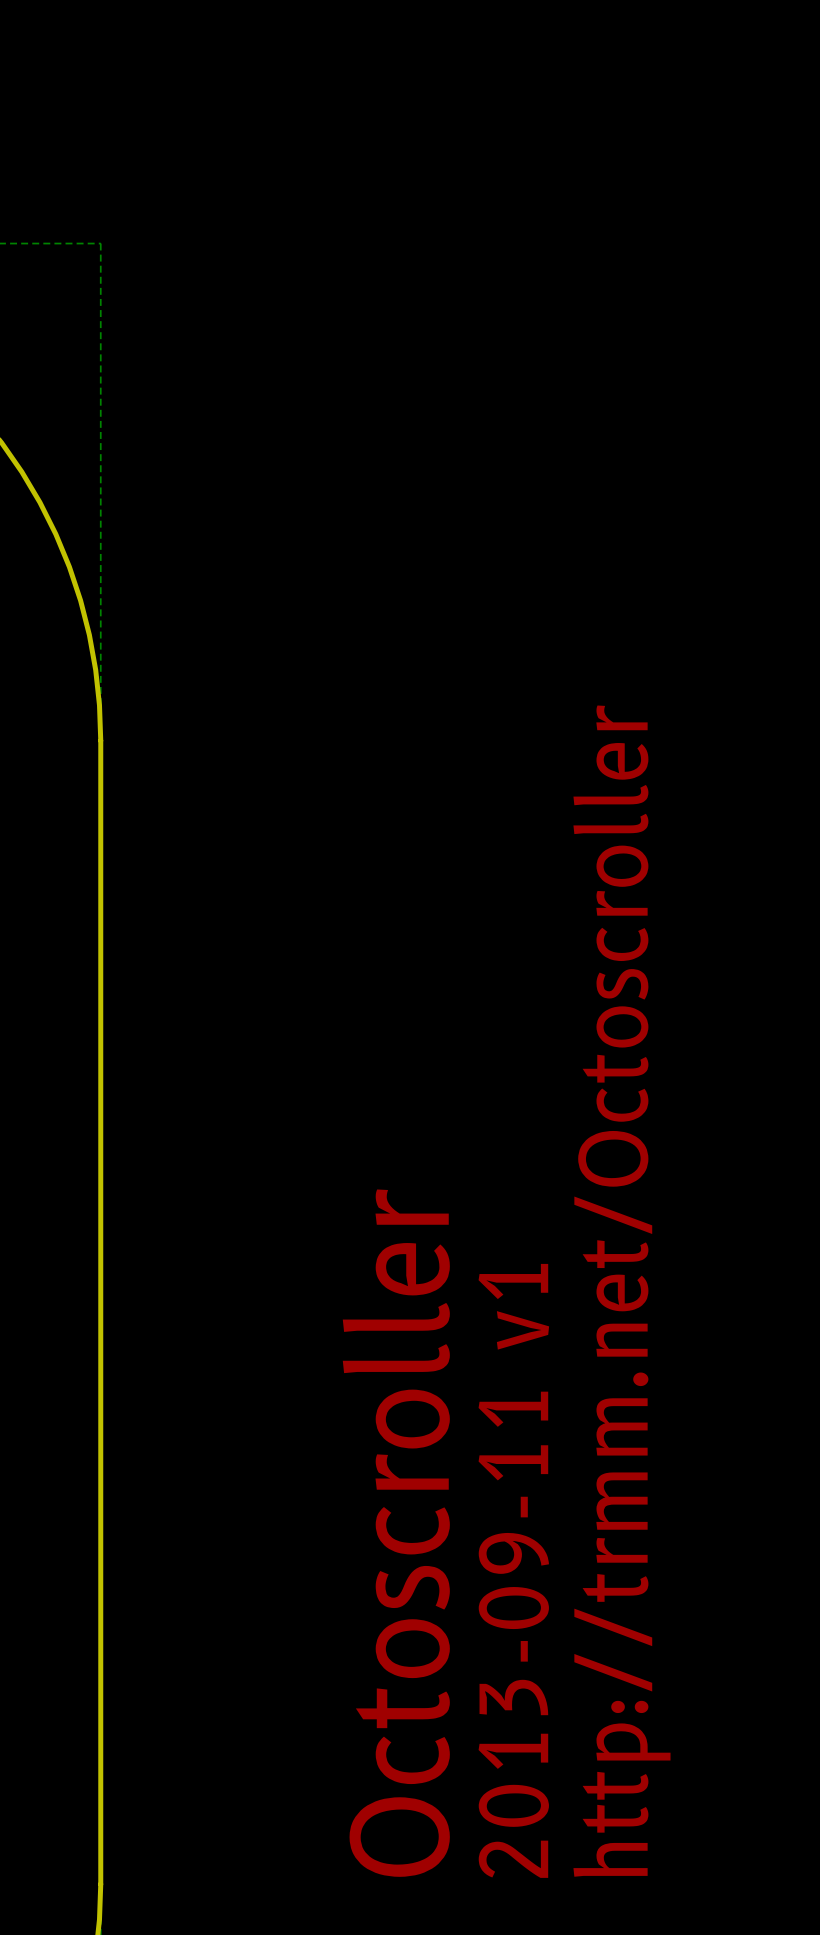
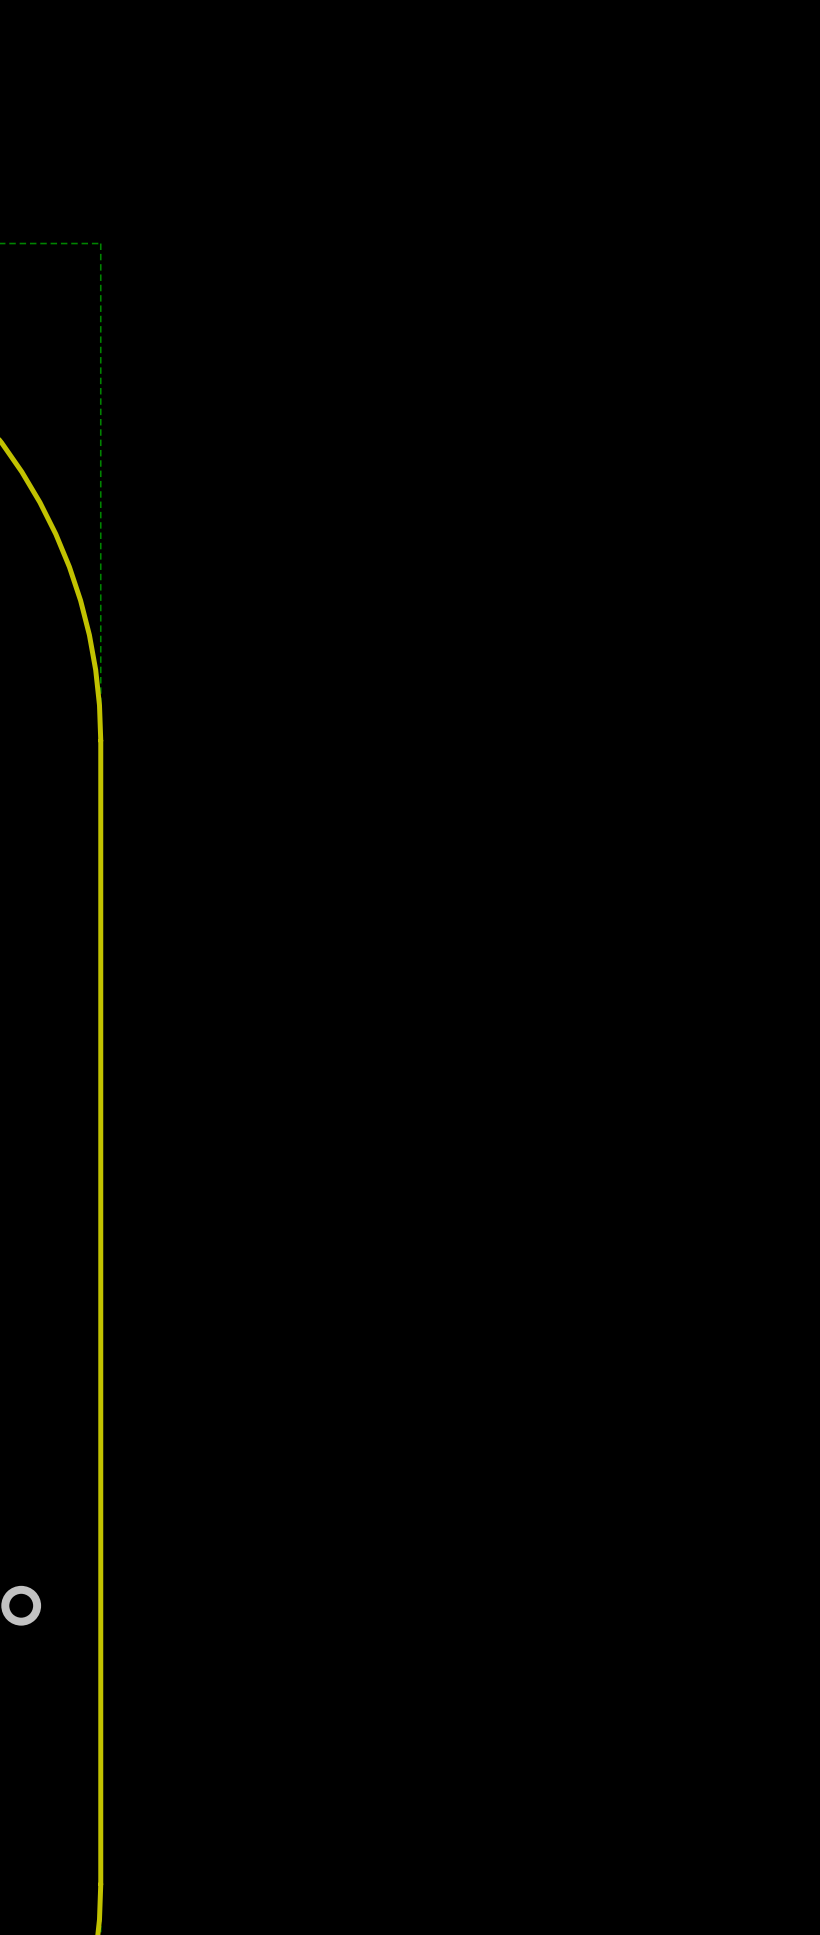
text: http://trmm.net/Octoscroller (621, 1291) -> none
text: Octoscroller (396, 1533) -> none
text: 2013-09-11 v1 (513, 1570) -> none
via: none -> (21, 1605)

